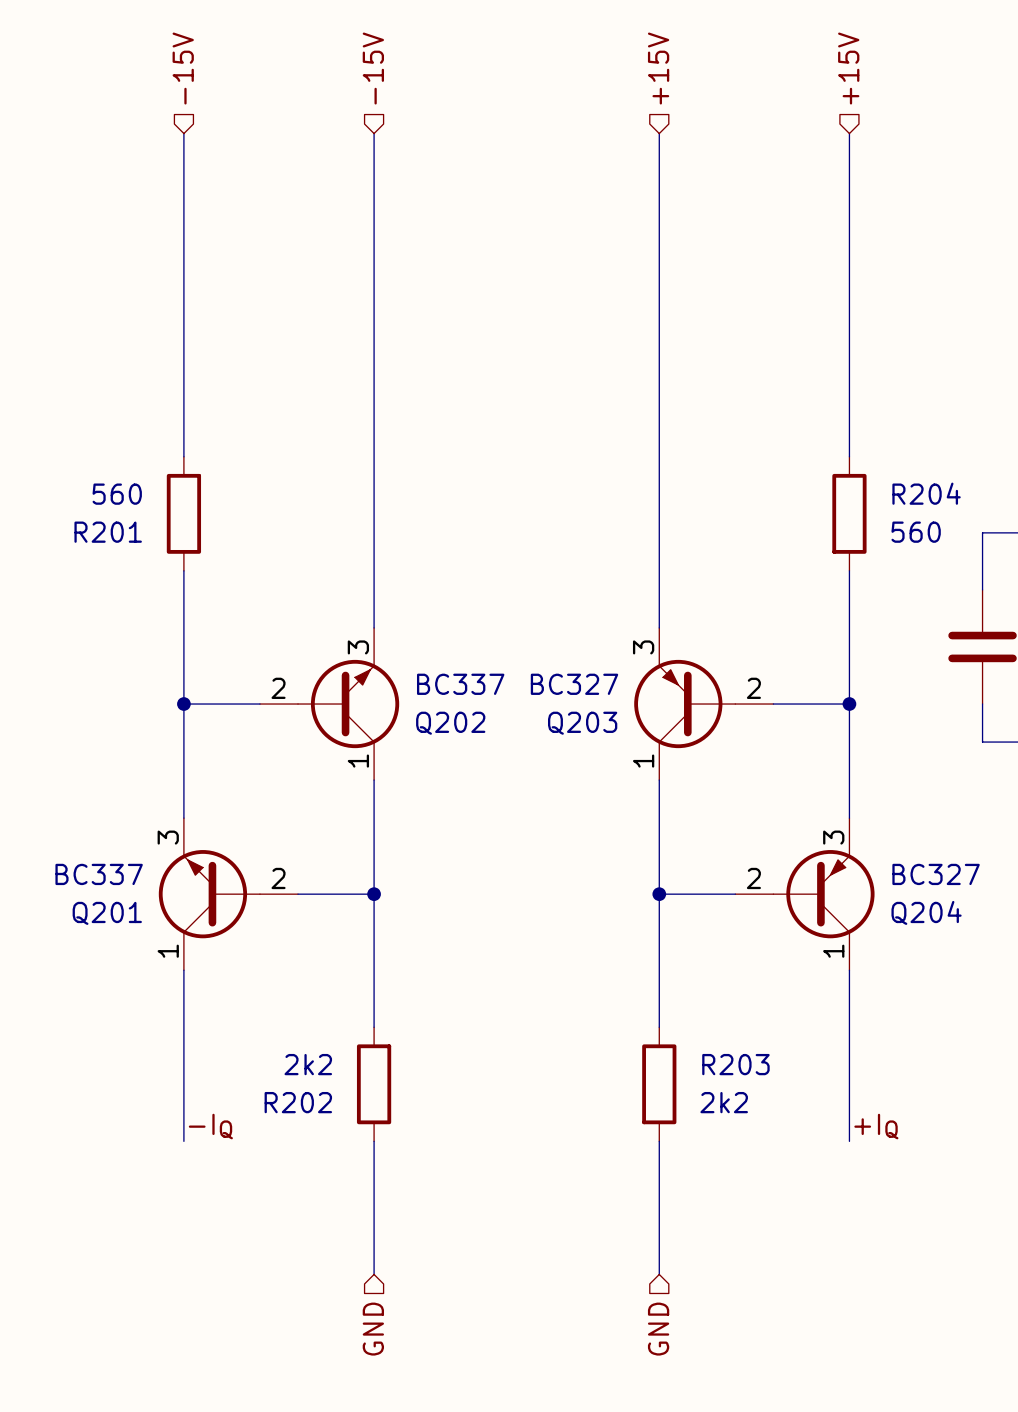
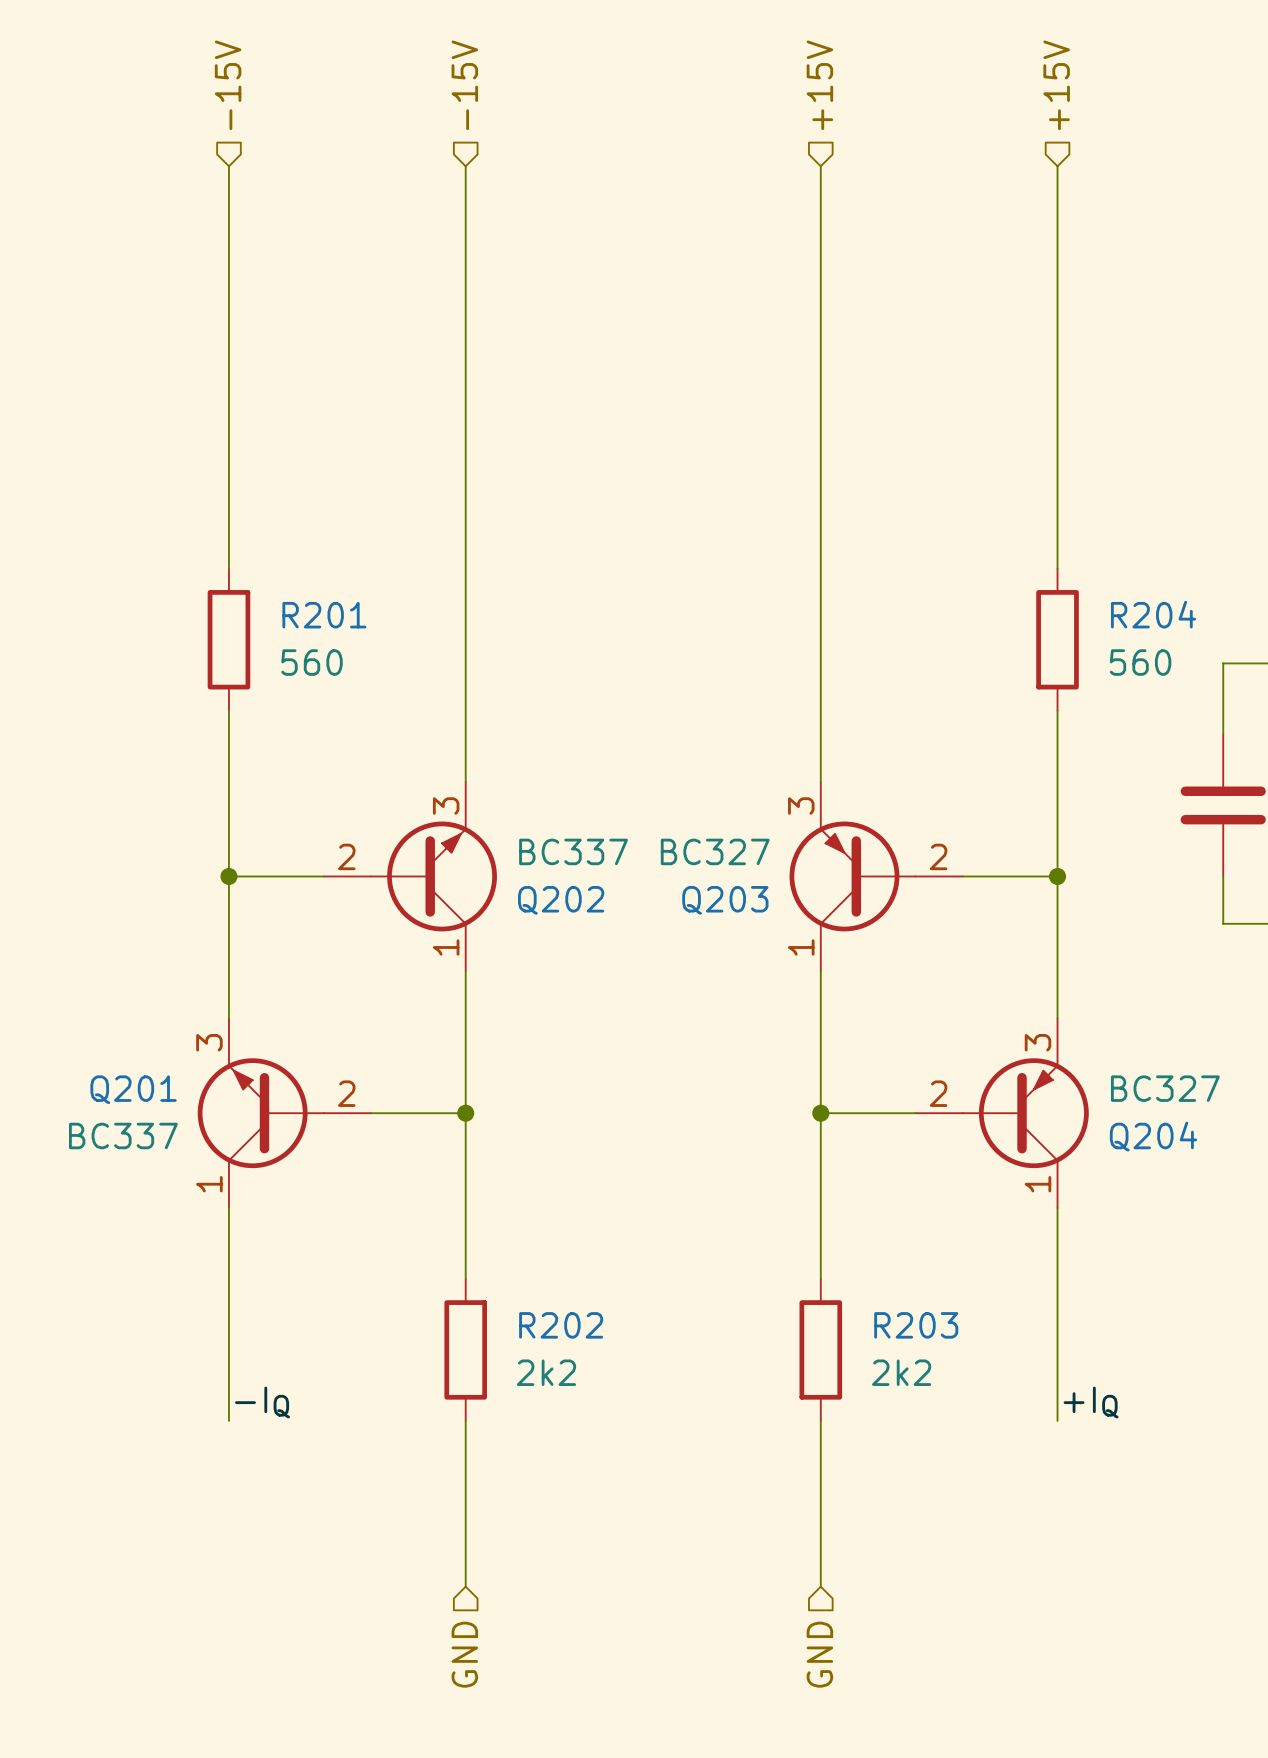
R201 value position: 560 (117, 494) -> 560 (312, 662)
R201 name position: R201 (108, 532) -> R201 (324, 615)
Q201 value position: BC337 (99, 874) -> BC337 (123, 1135)
Q201 name position: Q201 (107, 913) -> Q201 (133, 1089)
R202 value position: 2k2 (308, 1064) -> 2k2 (546, 1372)
R202 name position: R202 (298, 1102) -> R202 (561, 1325)

